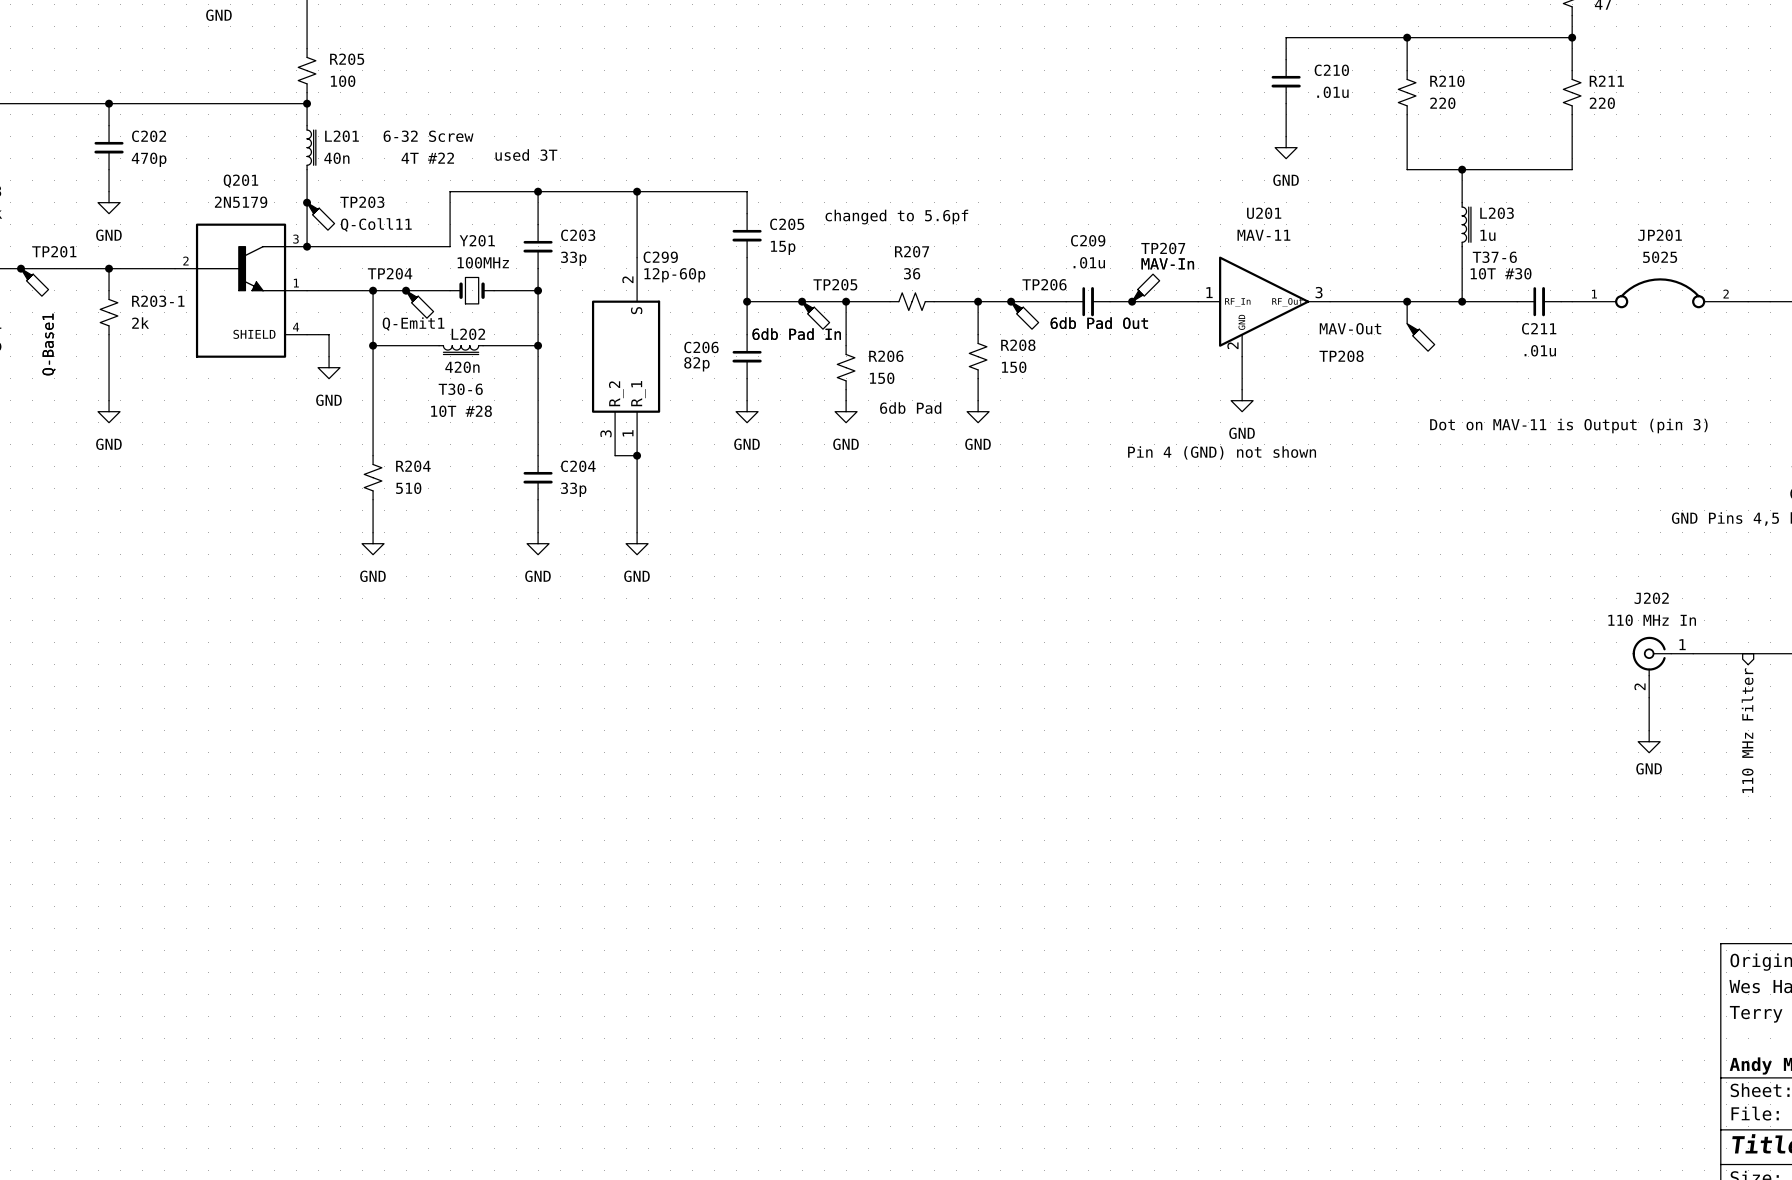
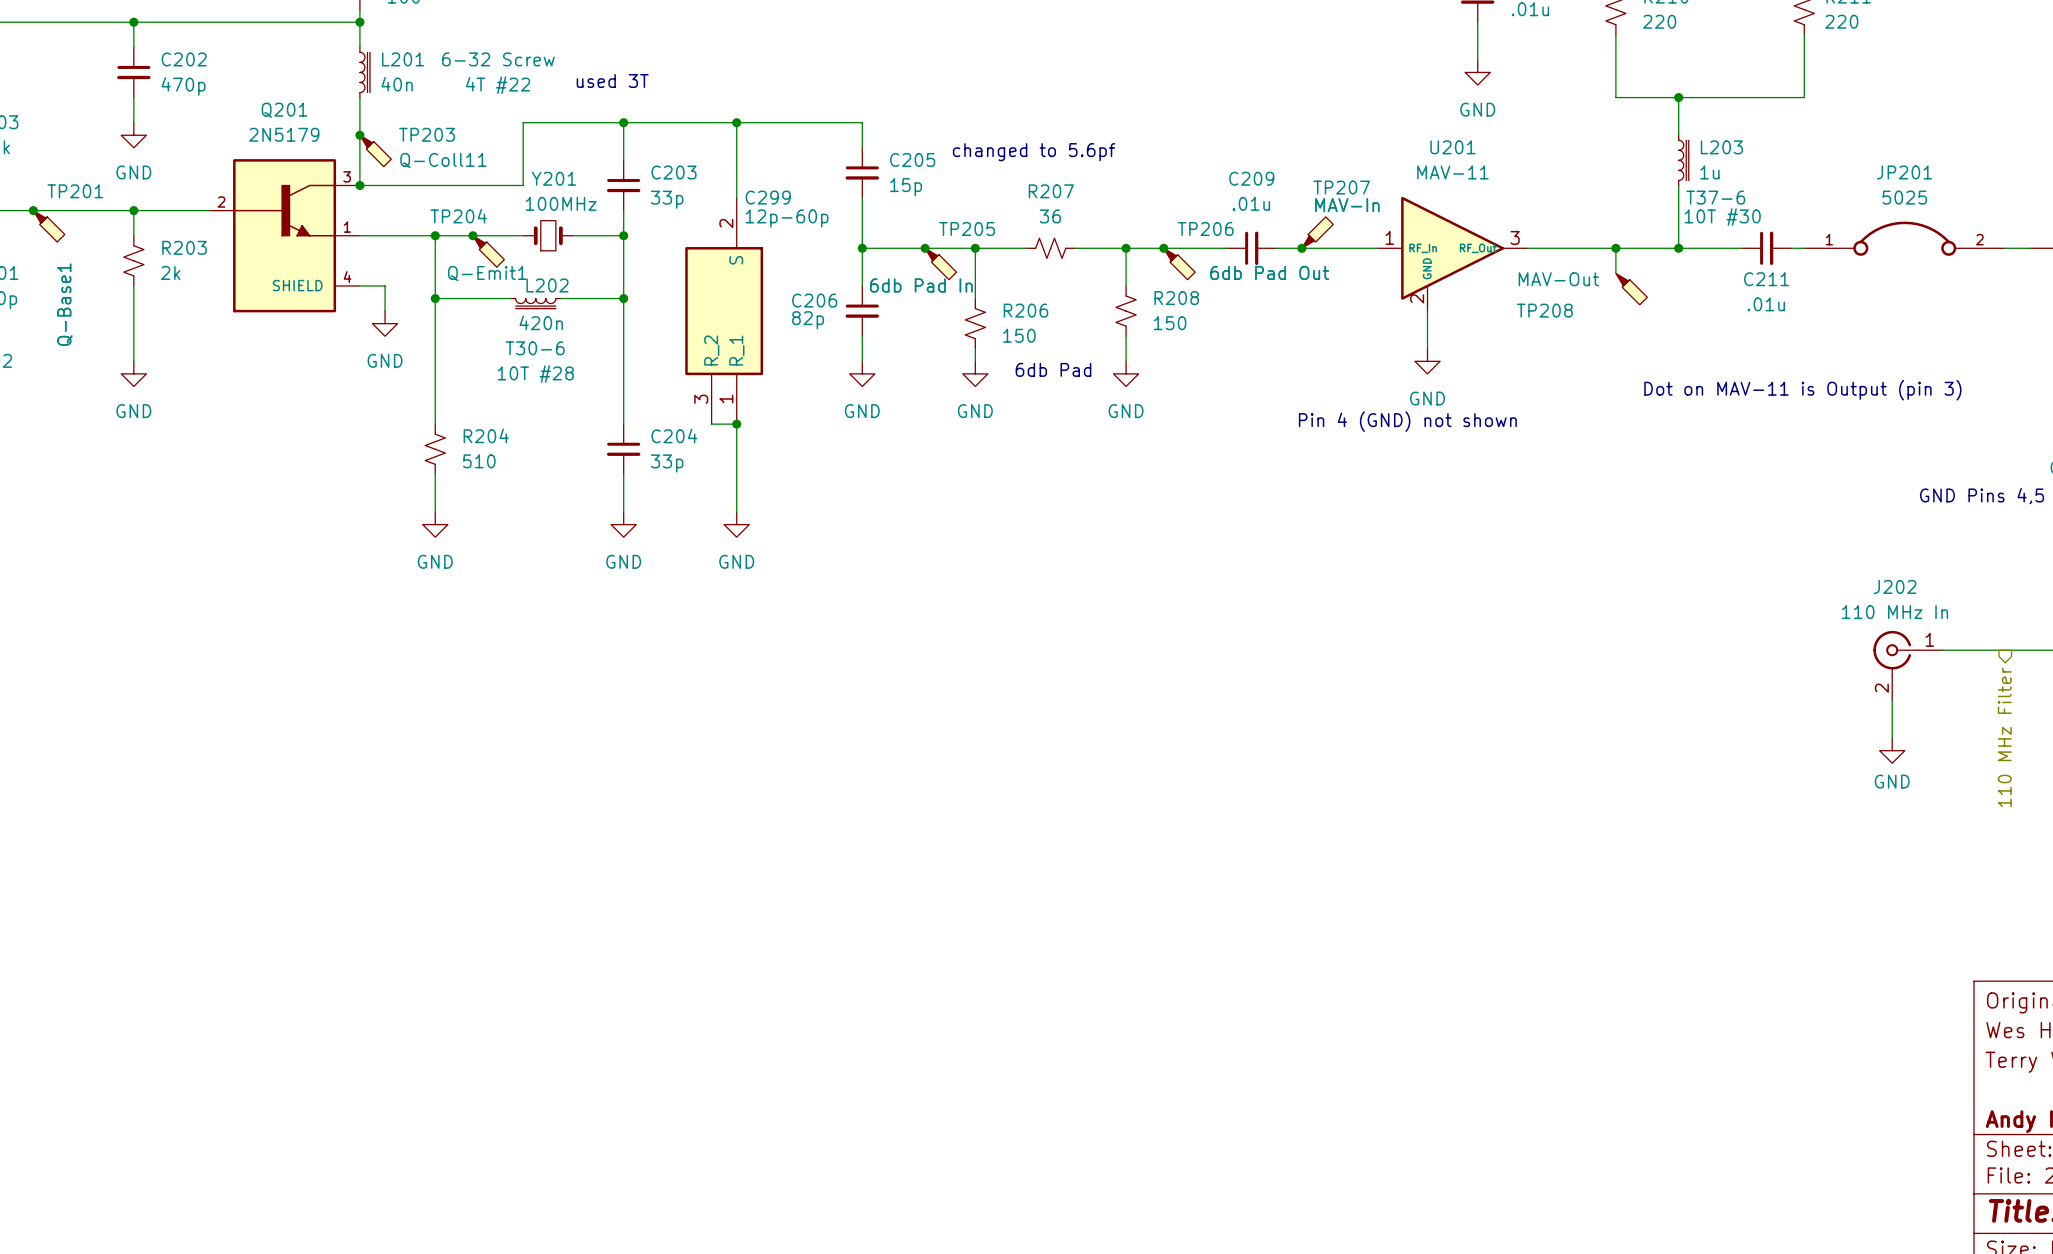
R203-1 name: R203-1 (158, 301) -> R203 (184, 247)

